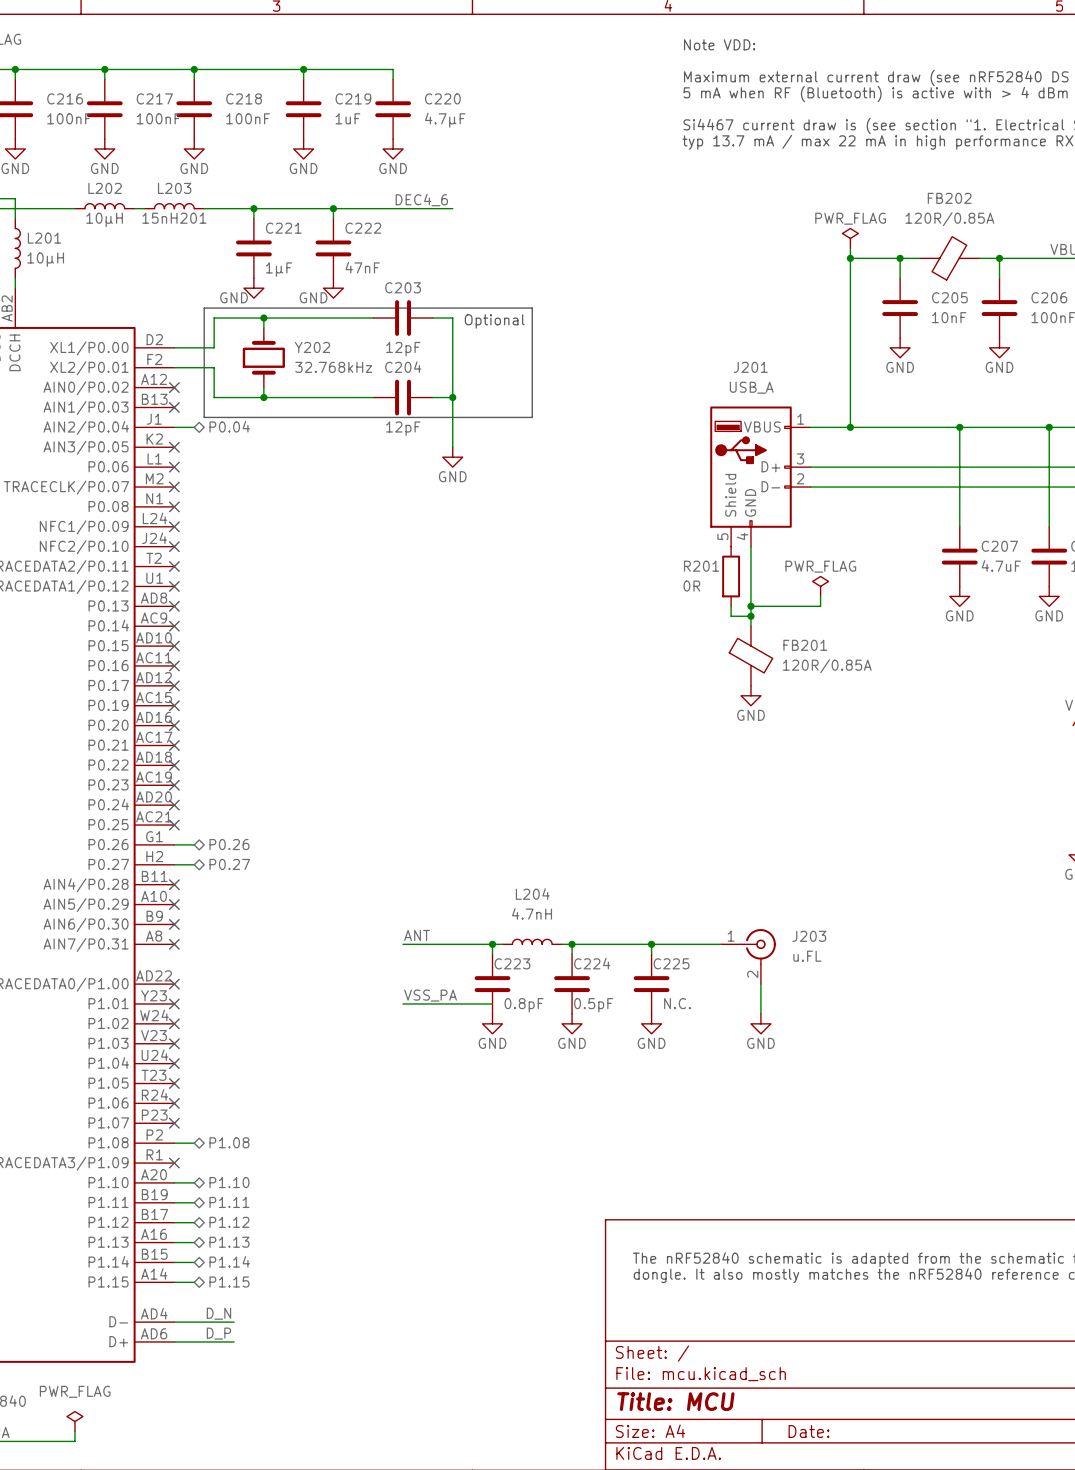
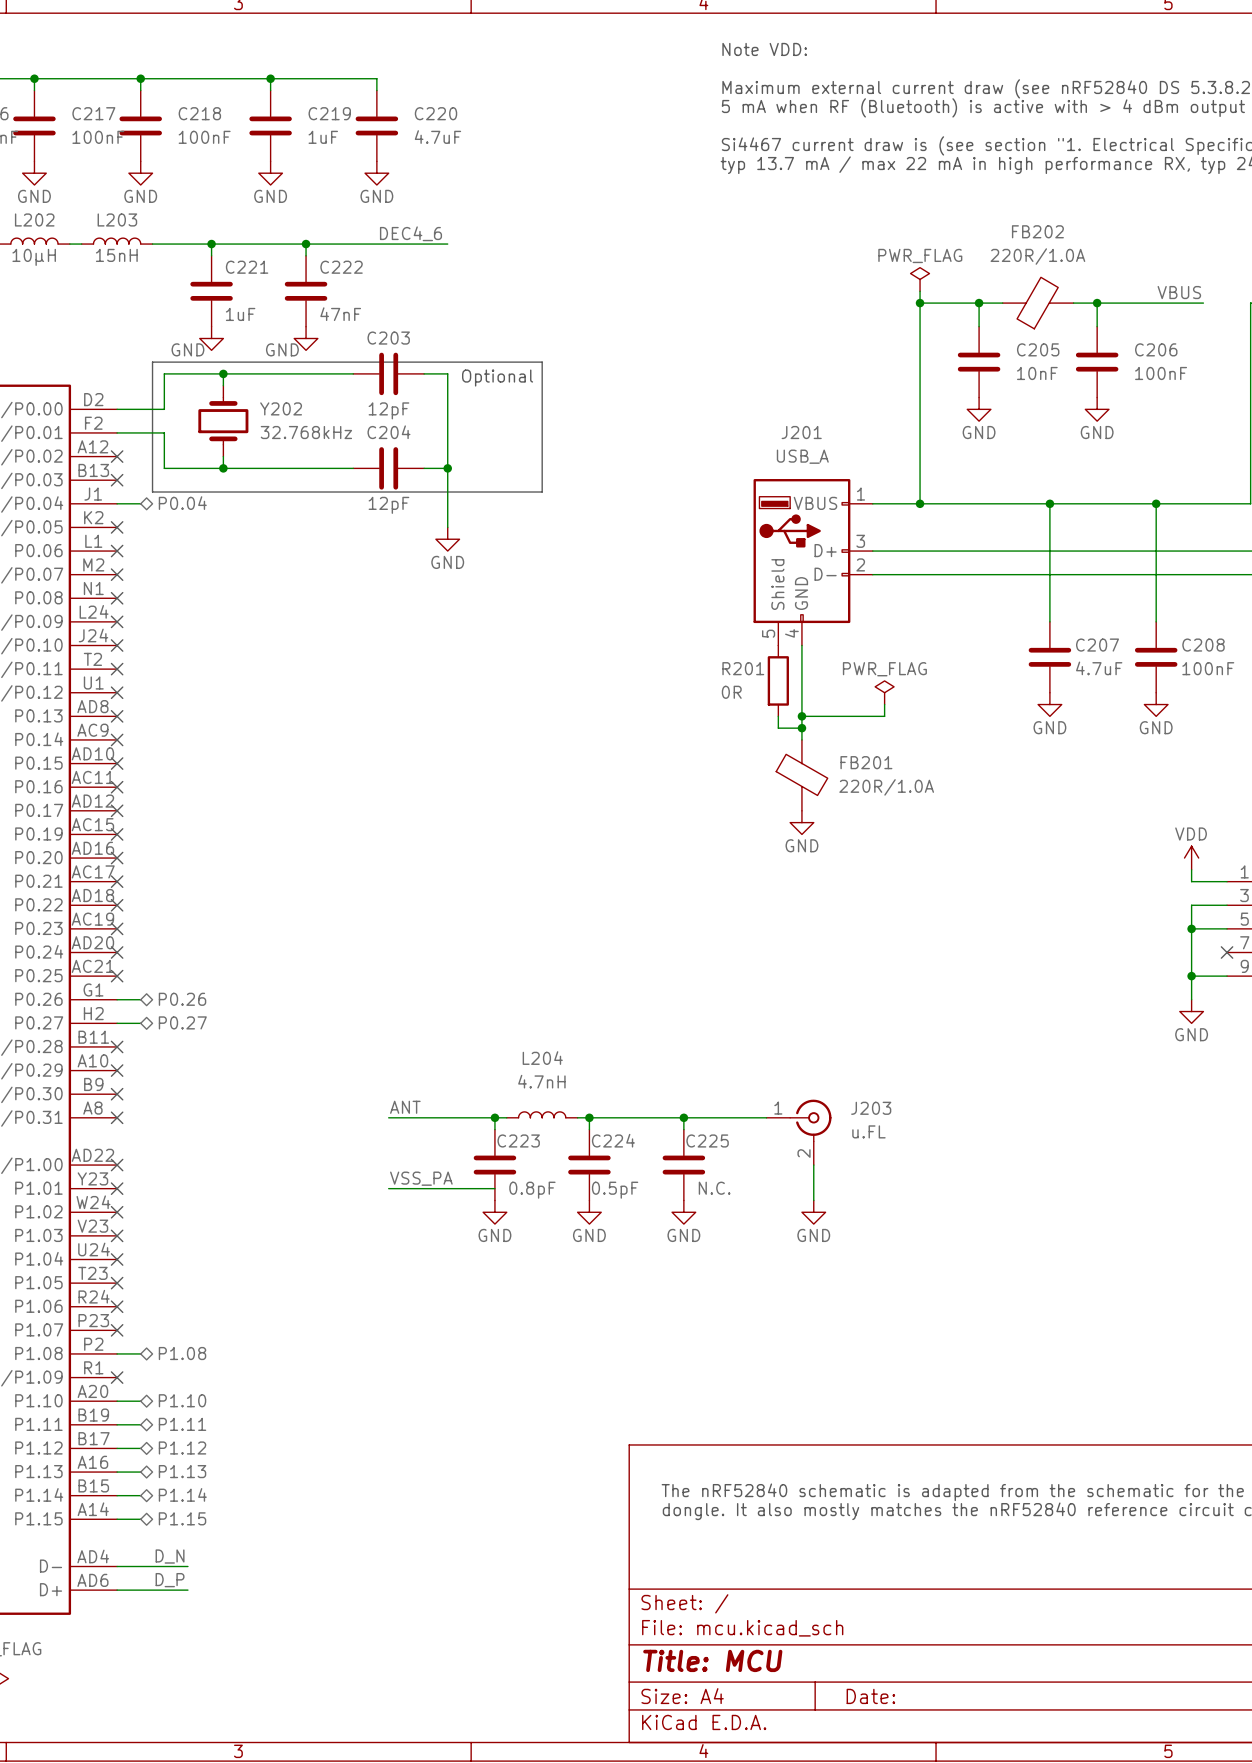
C220 value: 4.7μF (445, 120) -> 4.7uF (437, 137)
15nH201 value: L203 (174, 188) -> 15nH (116, 255)
15nH201 name: 15nH201 (174, 218) -> L203 (117, 219)
FB202 value: 120R/0.85A (949, 219) -> 220R/1.0A (1037, 256)
C221 value: 1μF (279, 269) -> 1uF (240, 314)
FB201 value: 120R/0.85A (827, 666) -> 220R/1.0A (886, 787)

